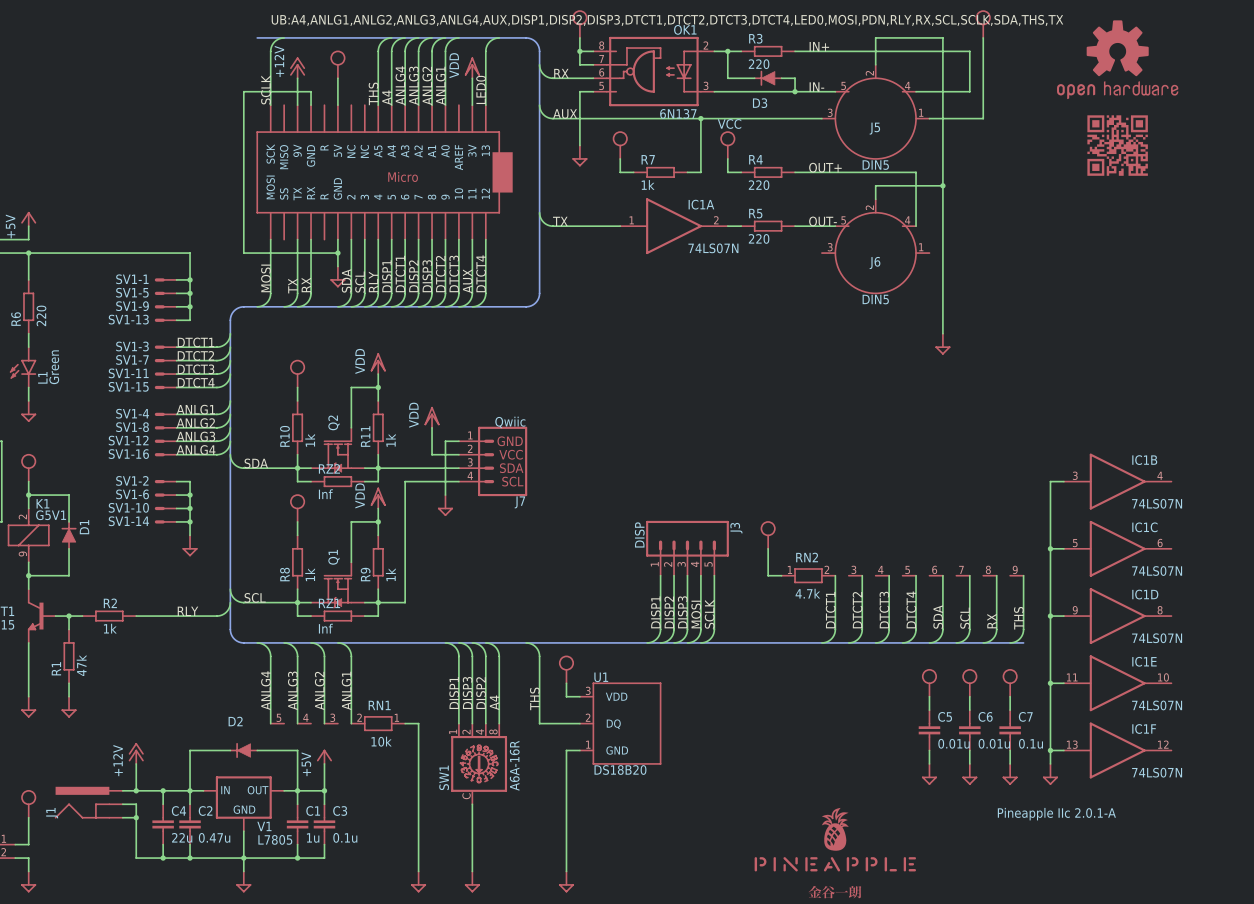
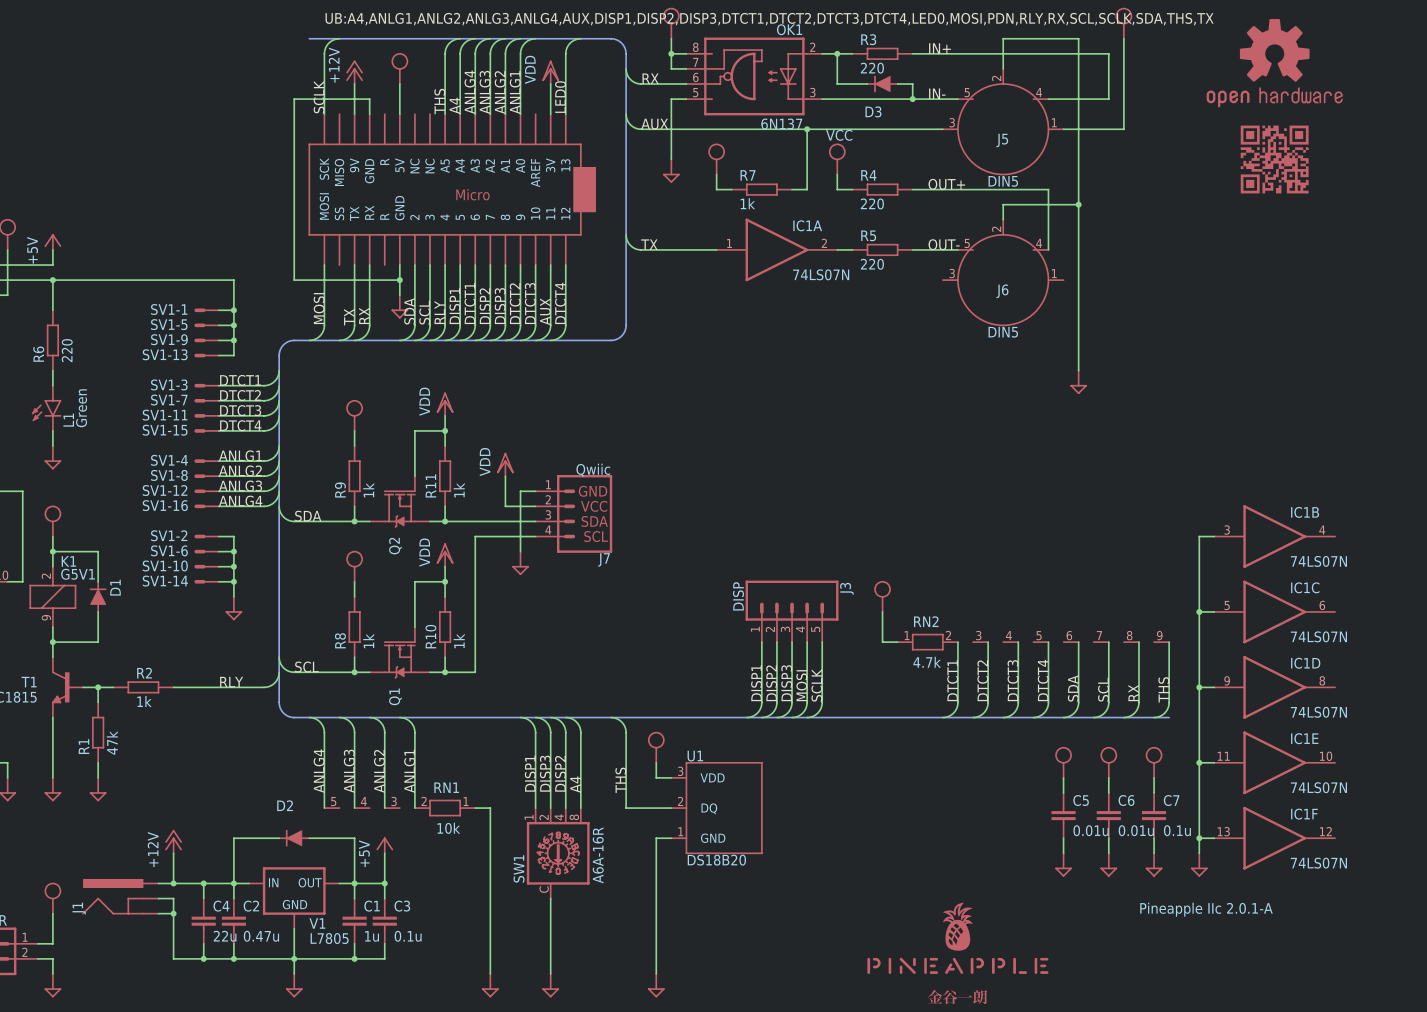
Q2 name position: Q2 (333, 422) -> Q2 (395, 546)
R10 name: R10 (284, 436) -> R9 (340, 489)
wire: (297, 468) (297, 481) (311, 481) -> none
wire: (378, 468) (378, 481) (364, 481) -> none
RZ2: Inf (337, 481) -> none
Q1 name position: Q1 (333, 557) -> Q1 (395, 696)
R9 name: R9 (365, 574) -> R10 (430, 636)
wire: (297, 602) (297, 616) (311, 616) -> none
wire: (378, 602) (378, 616) (364, 616) -> none
RZ1: Inf (337, 616) -> none

